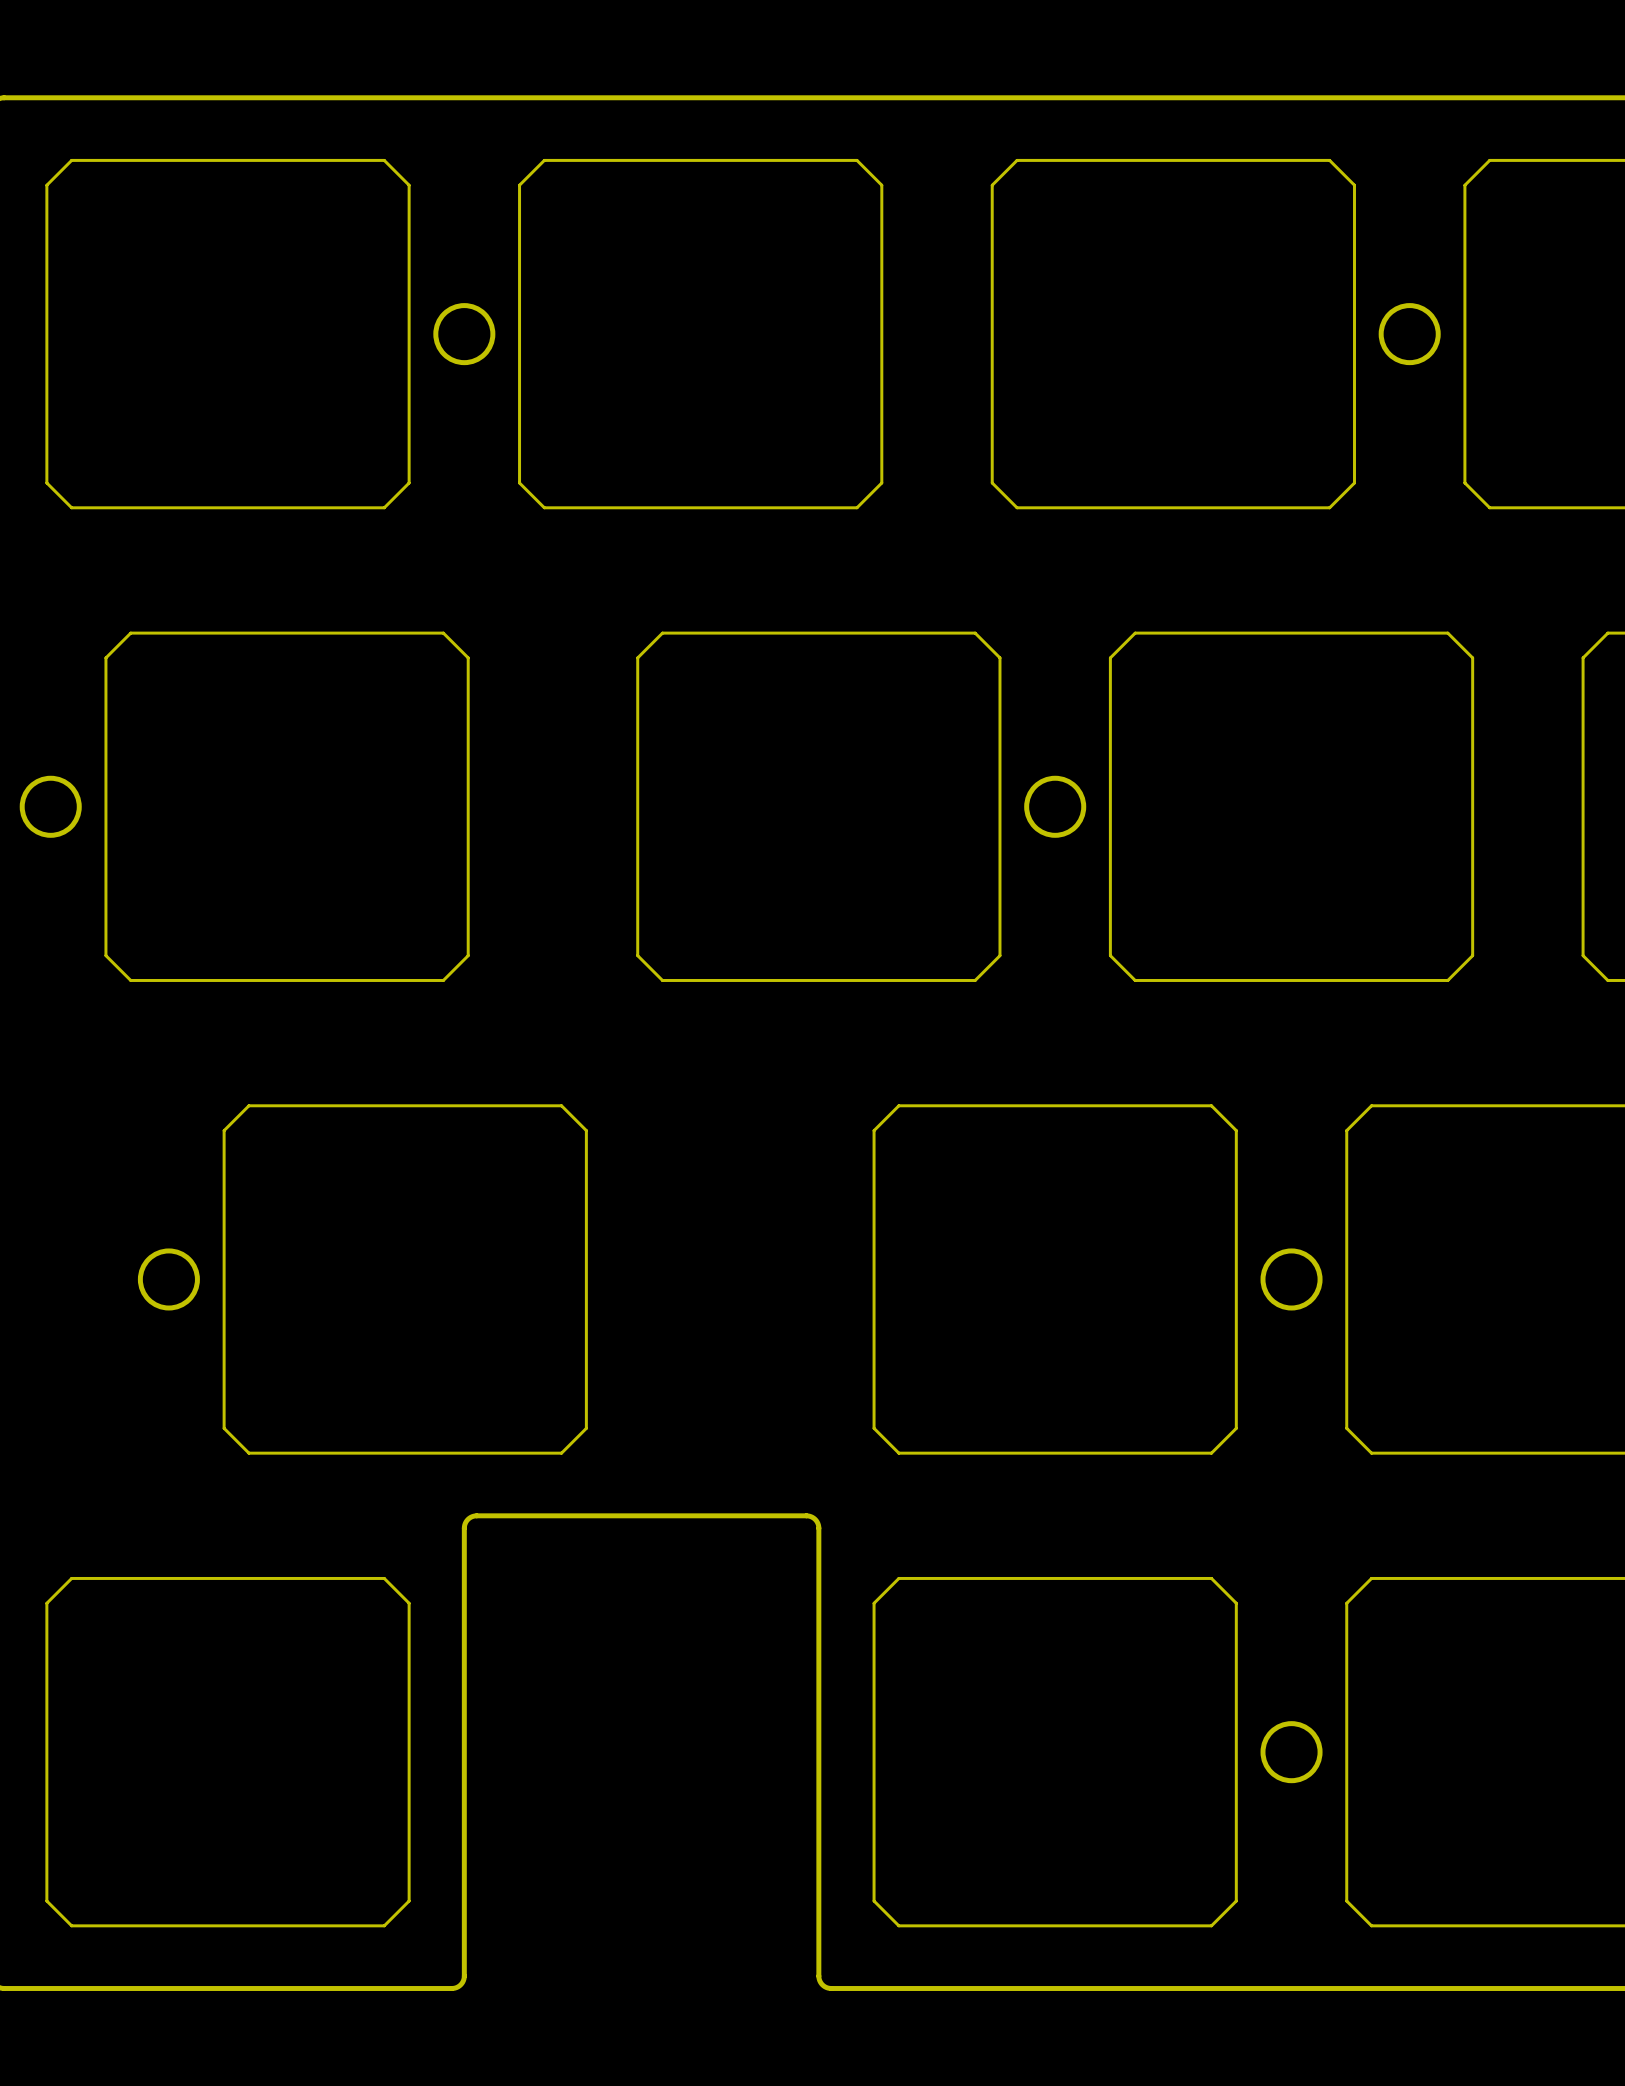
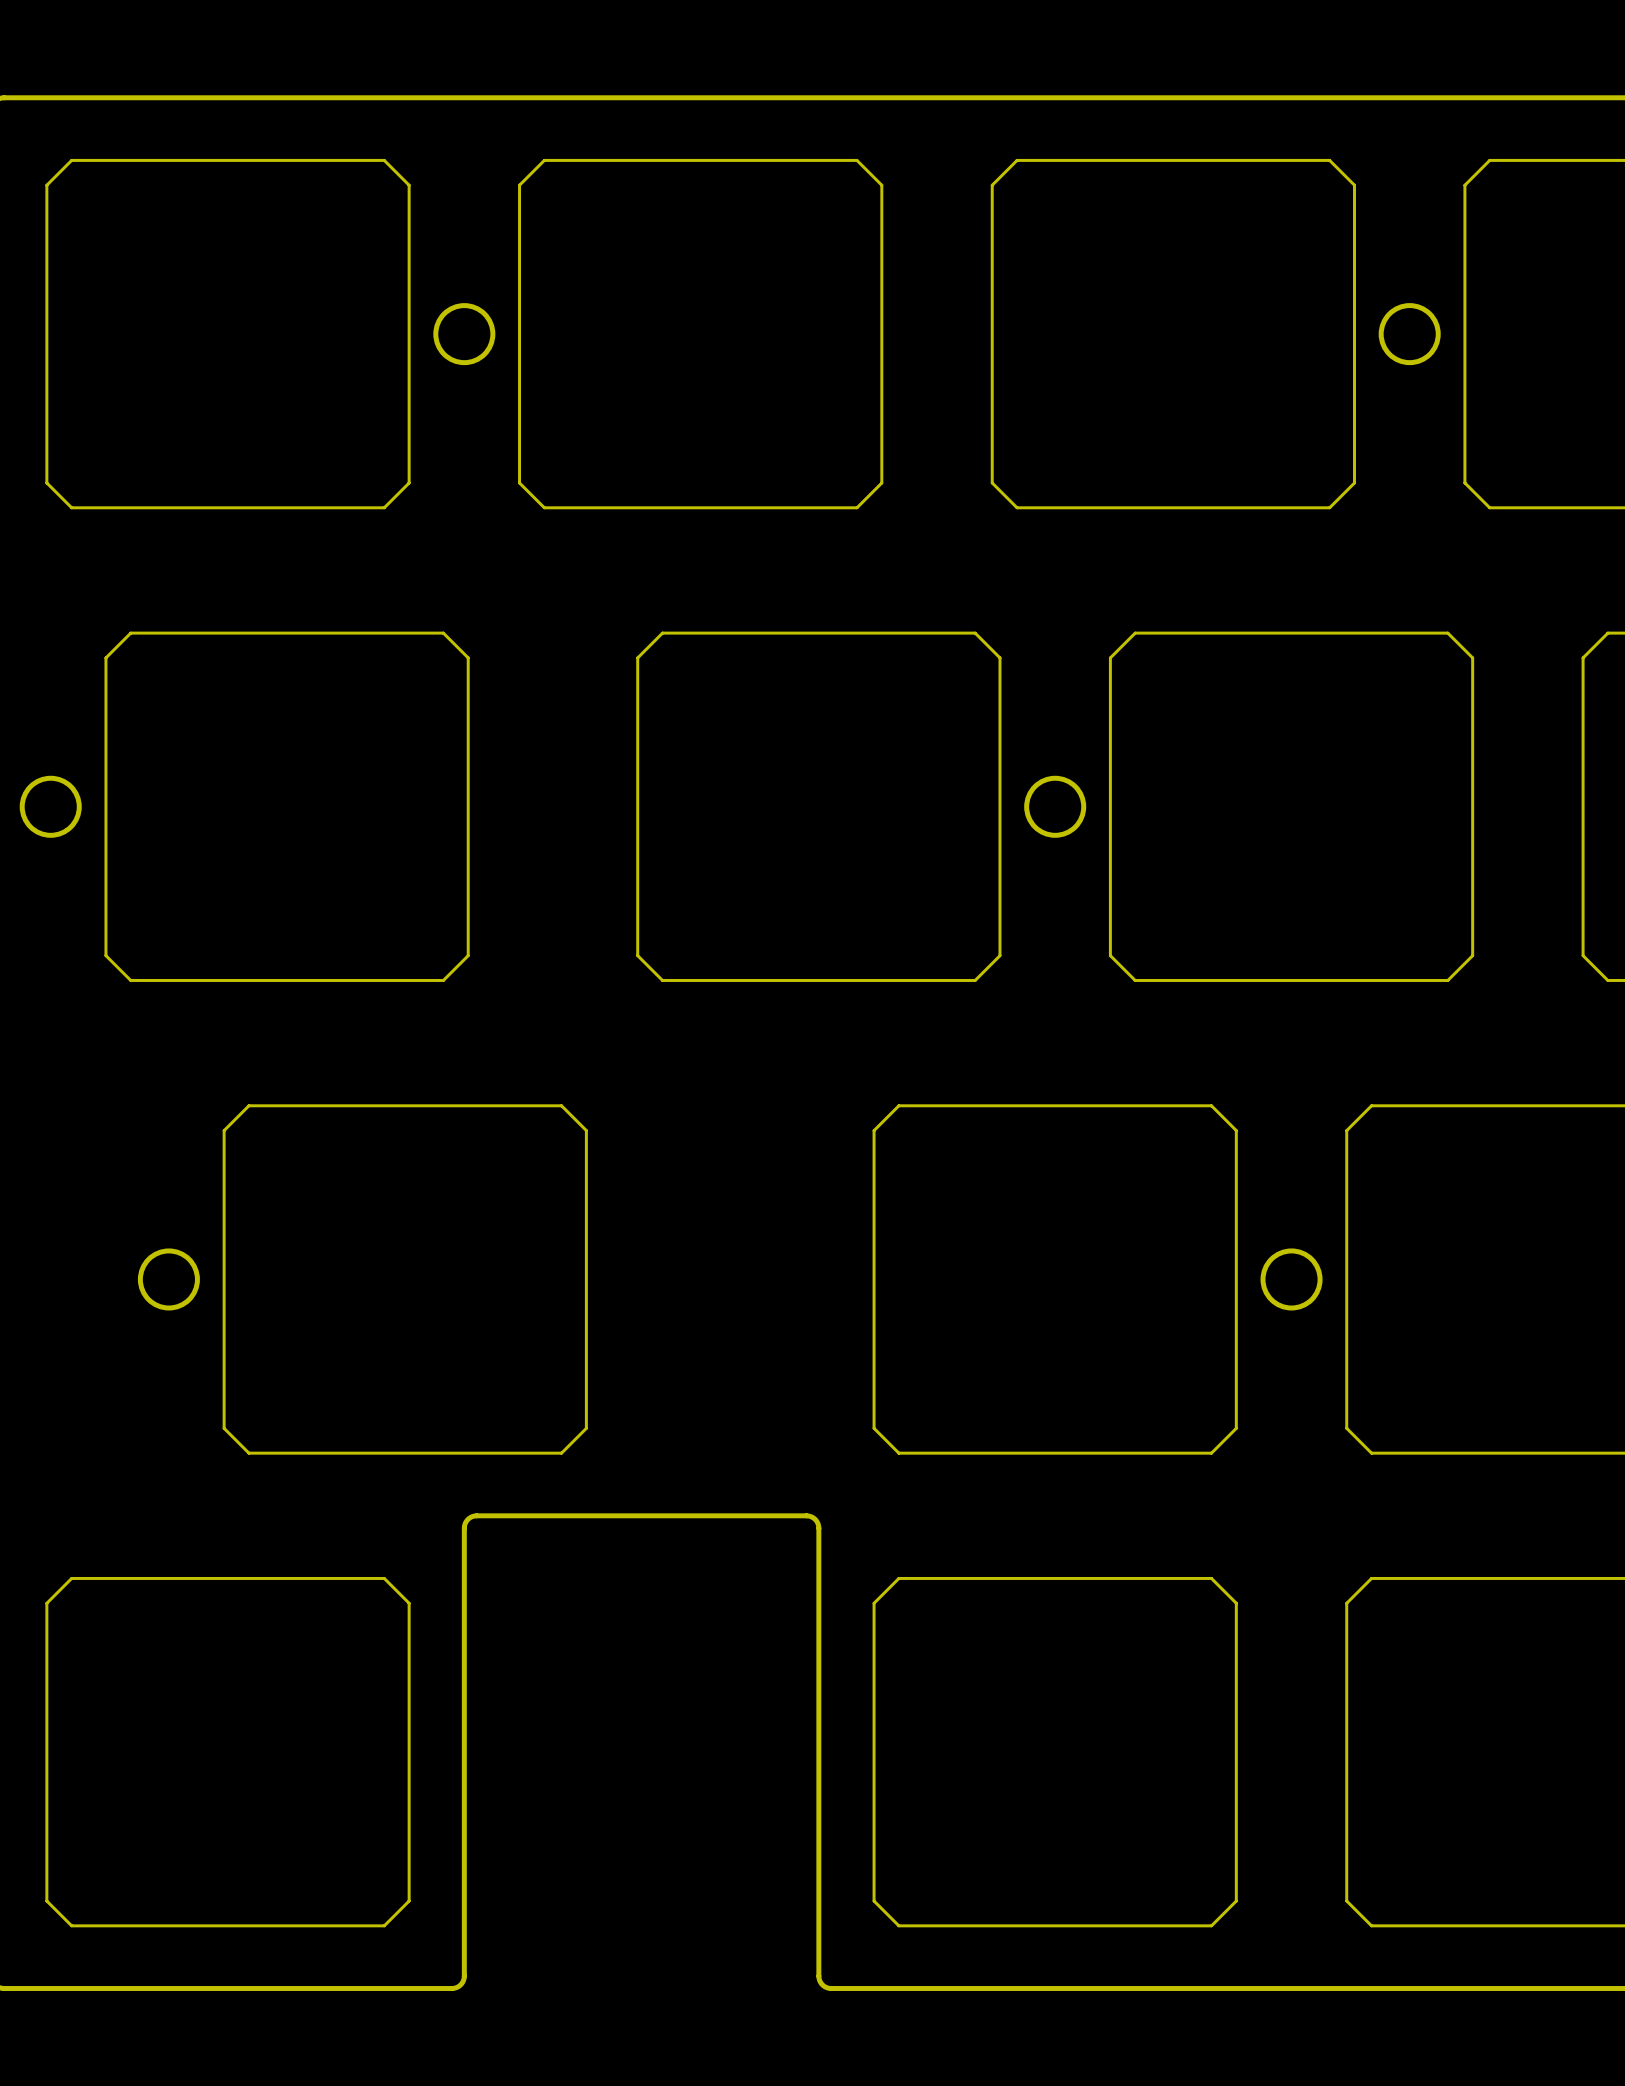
round board edge: [1260, 1721, 1323, 1784] -> none

